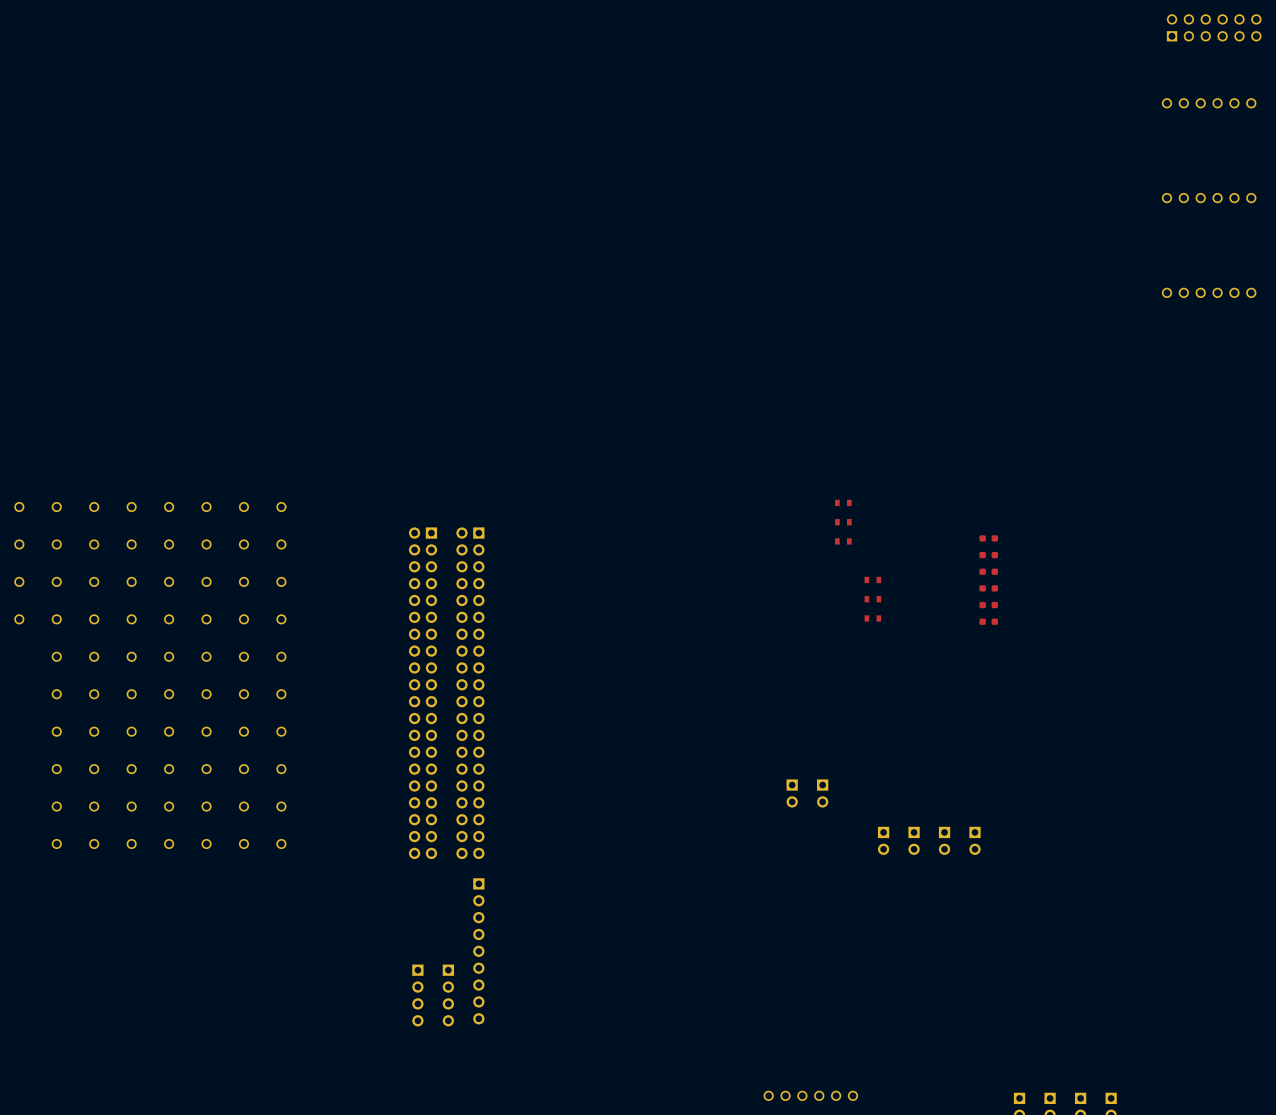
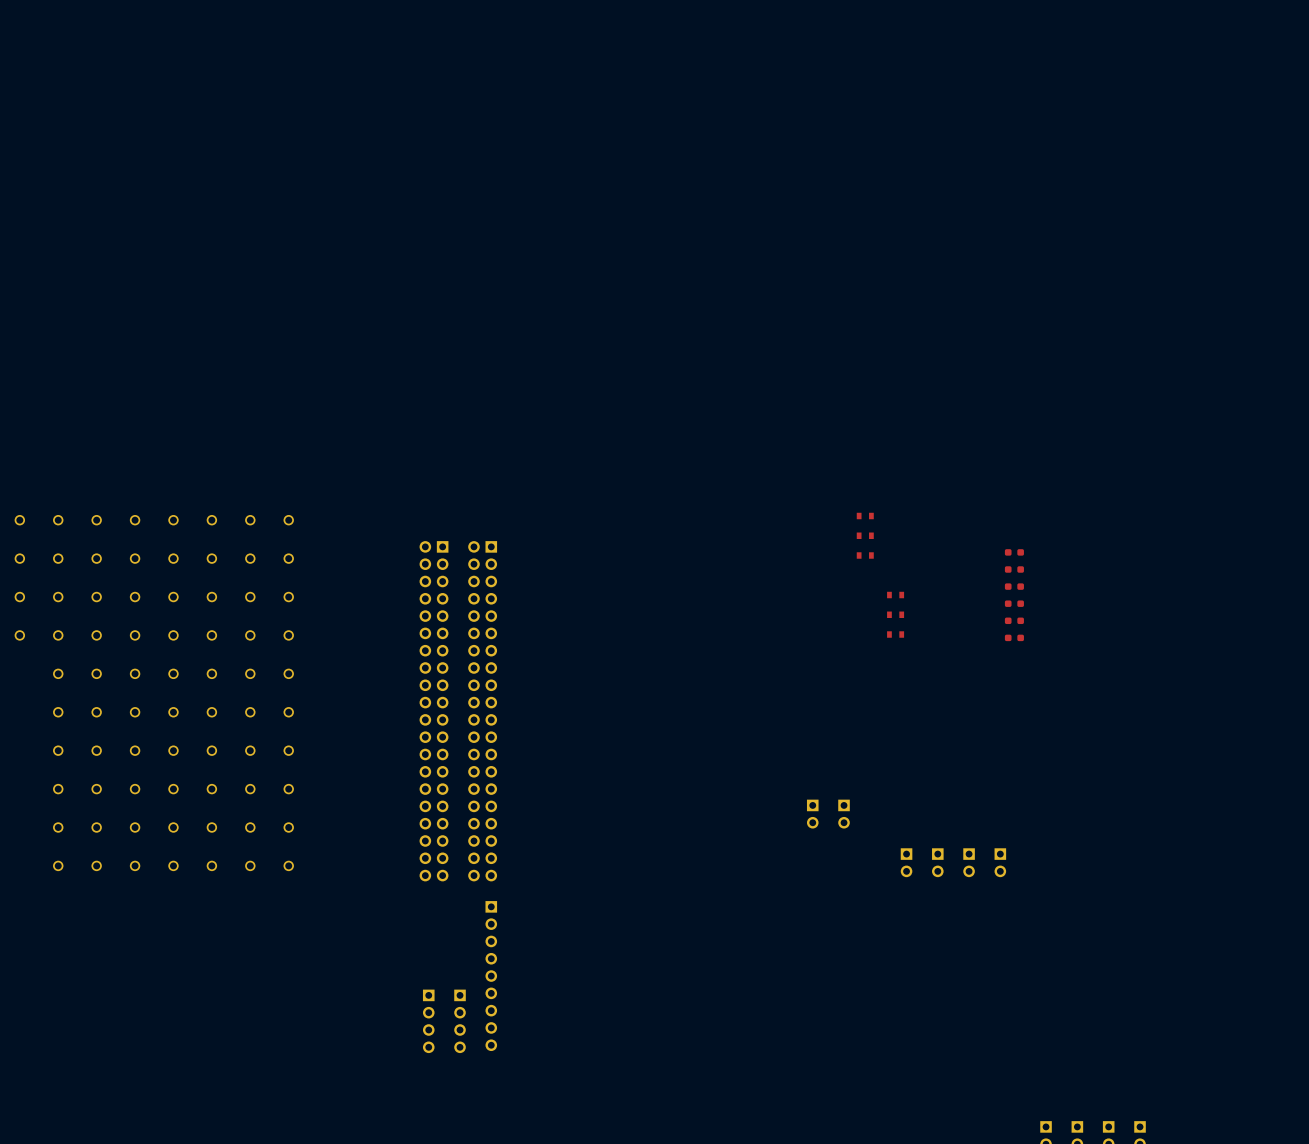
part: (1214, 27) -> none
part: (1209, 103) -> none
part: (1209, 198) -> none
part: (1209, 292) -> none
part: (810, 1095) -> none

